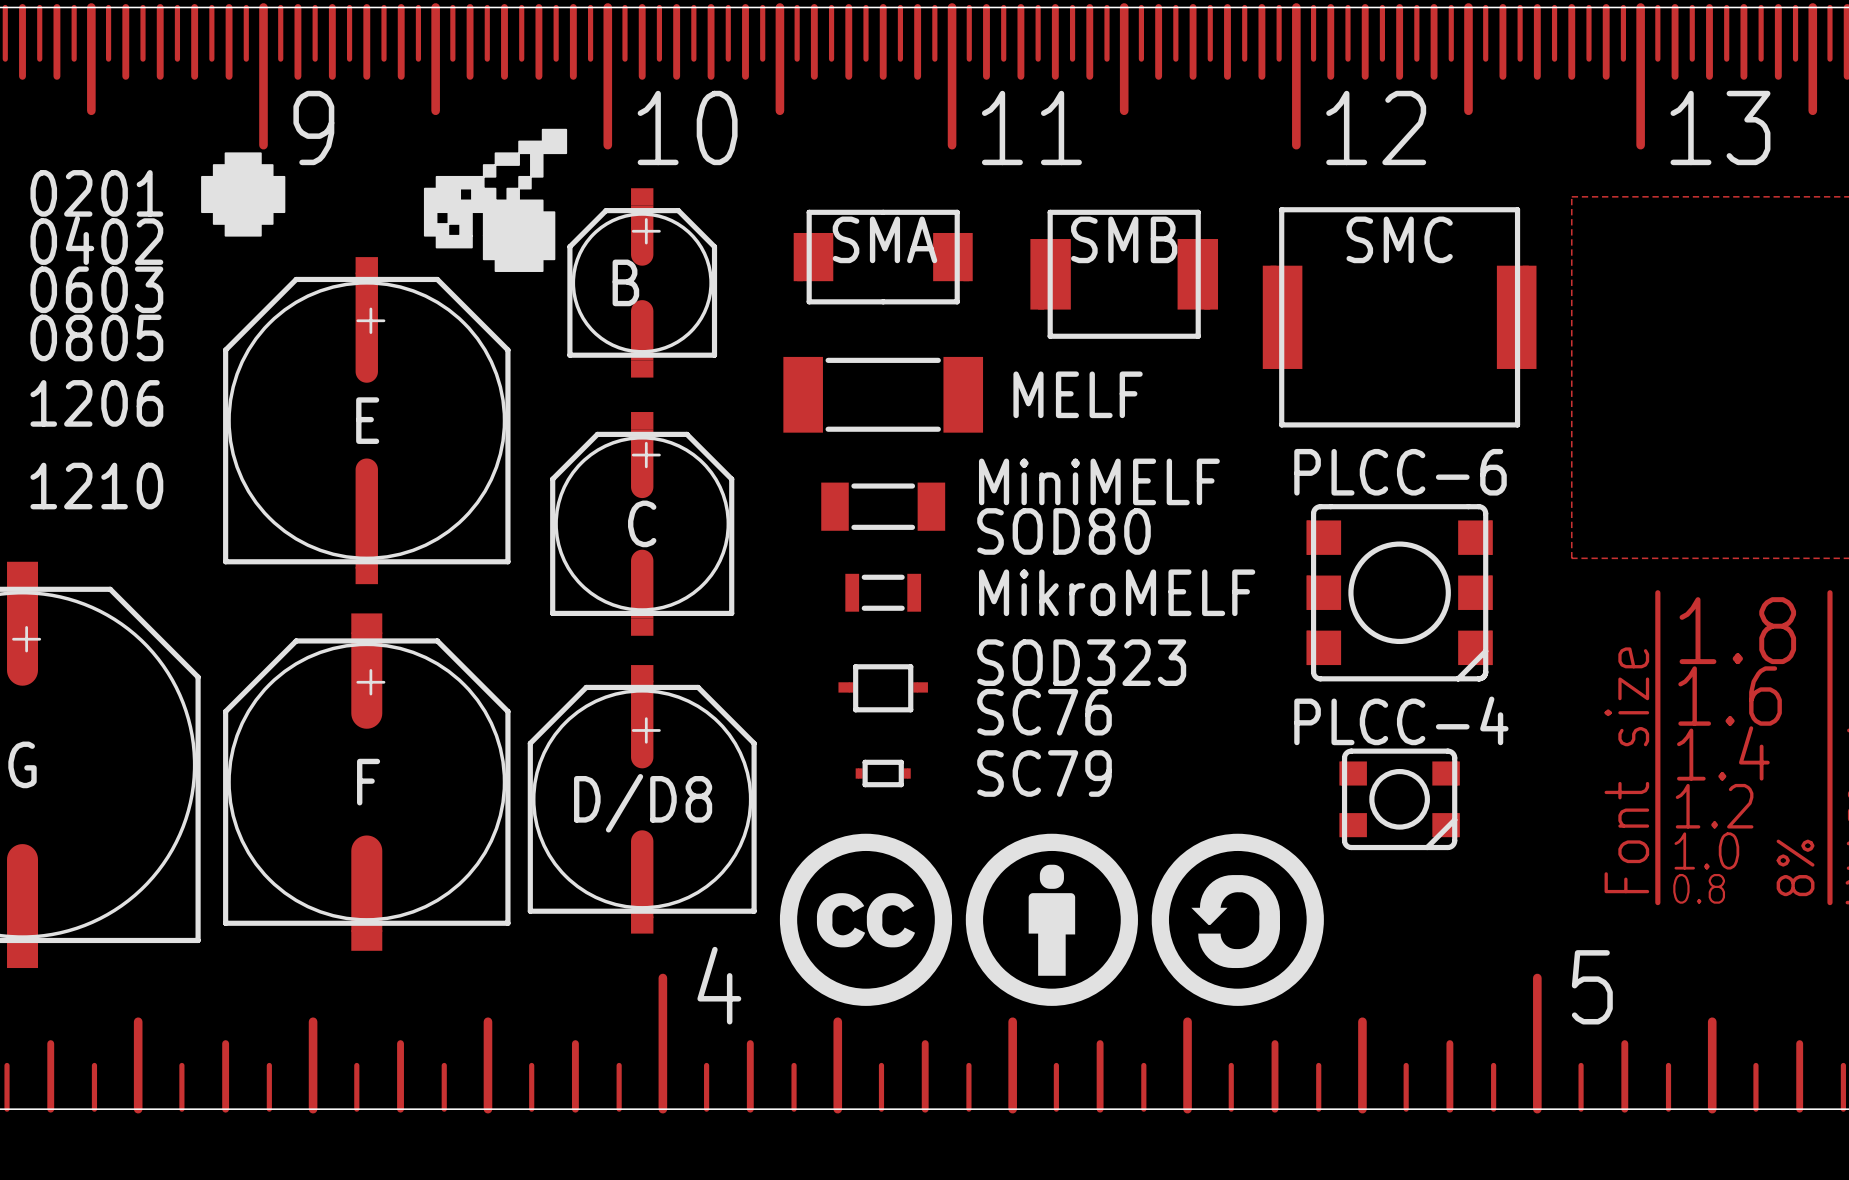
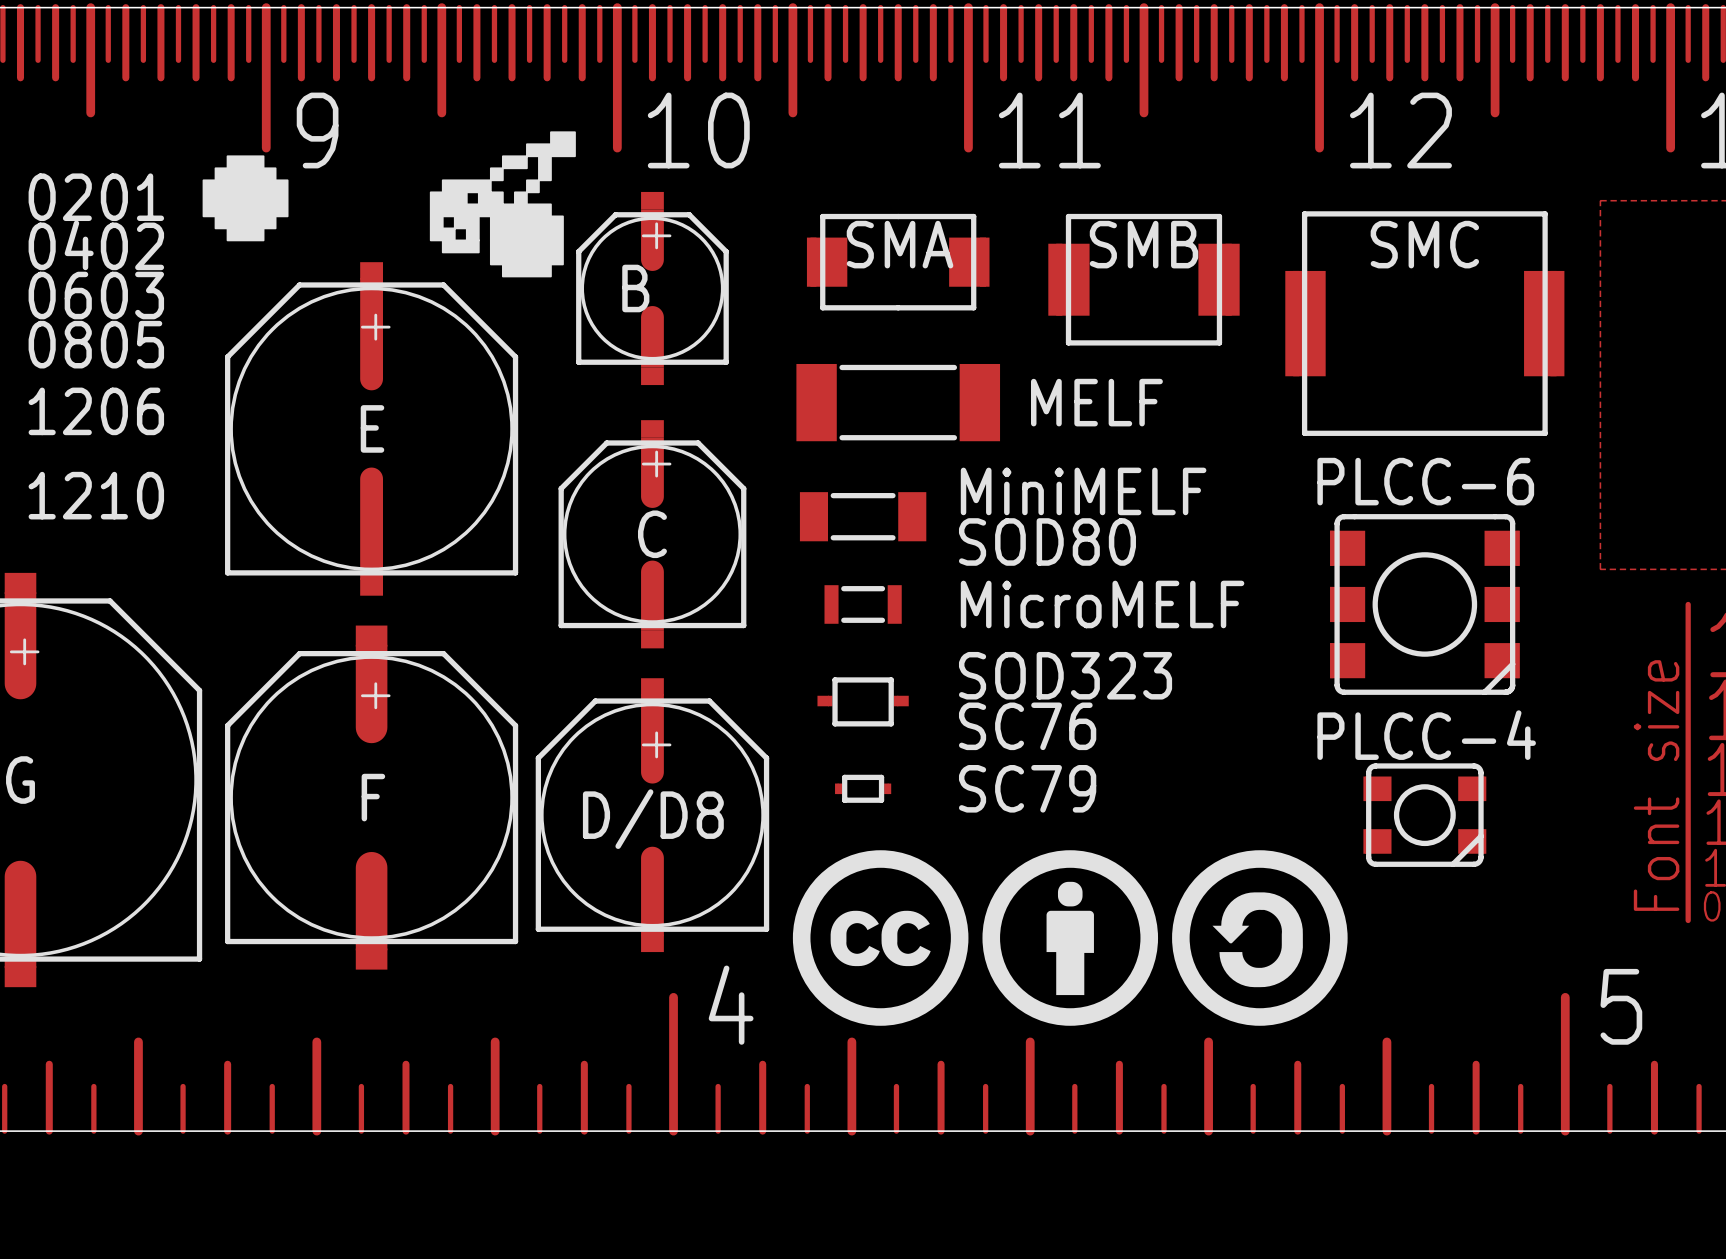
text position: MiniMELF (1099, 481) -> MiniMELF (1083, 491)
part position: (883, 506) -> (863, 516)
text position: SOD80 (1063, 531) -> SOD80 (1047, 541)
part position: (883, 592) -> (863, 604)
text: MikroMELF (1117, 592) -> MicroMELF (1102, 604)
text position: SOD323 (1081, 662) -> SOD323 (1065, 675)
part position: (883, 688) -> (863, 701)
text position: SC76 (1044, 712) -> SC76 (1027, 726)
part position: (883, 773) -> (863, 788)
text position: SC79 (1044, 773) -> SC79 (1027, 788)

